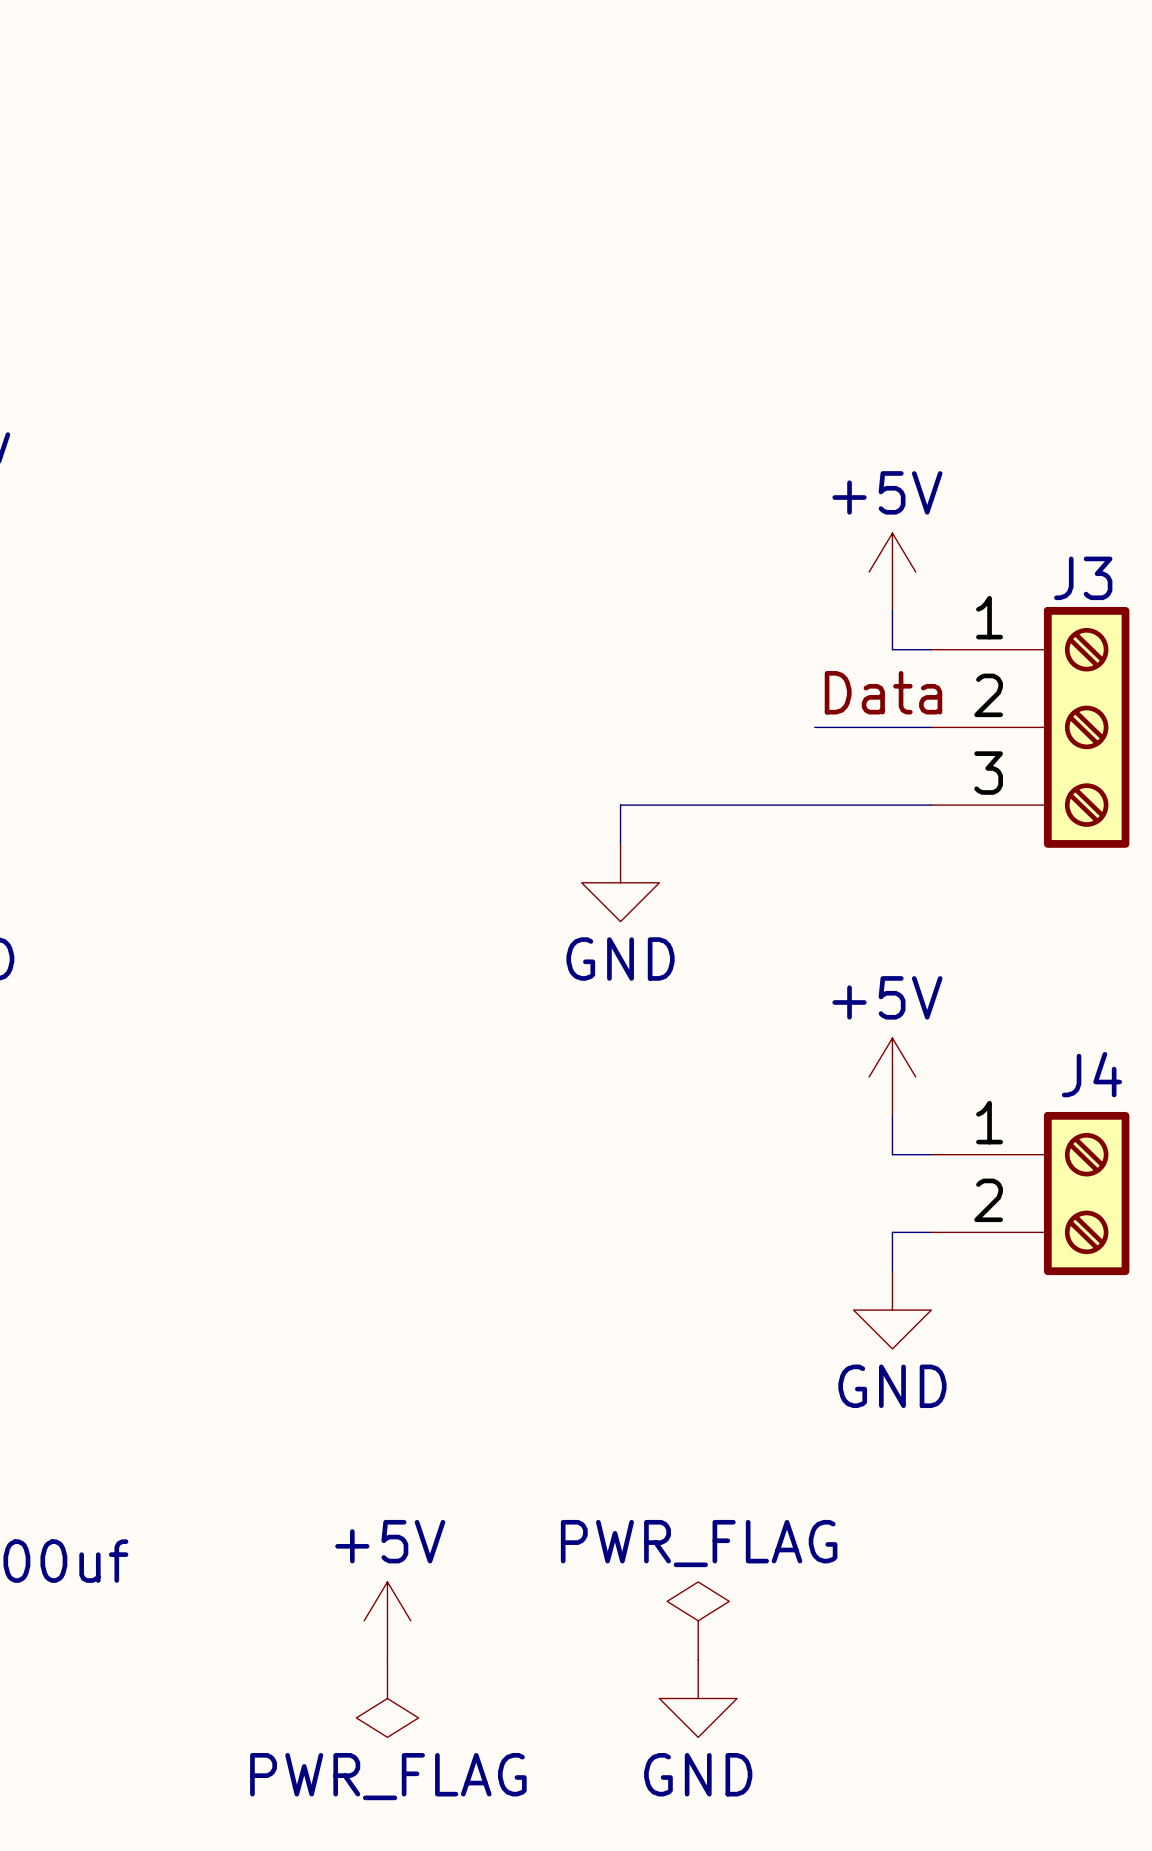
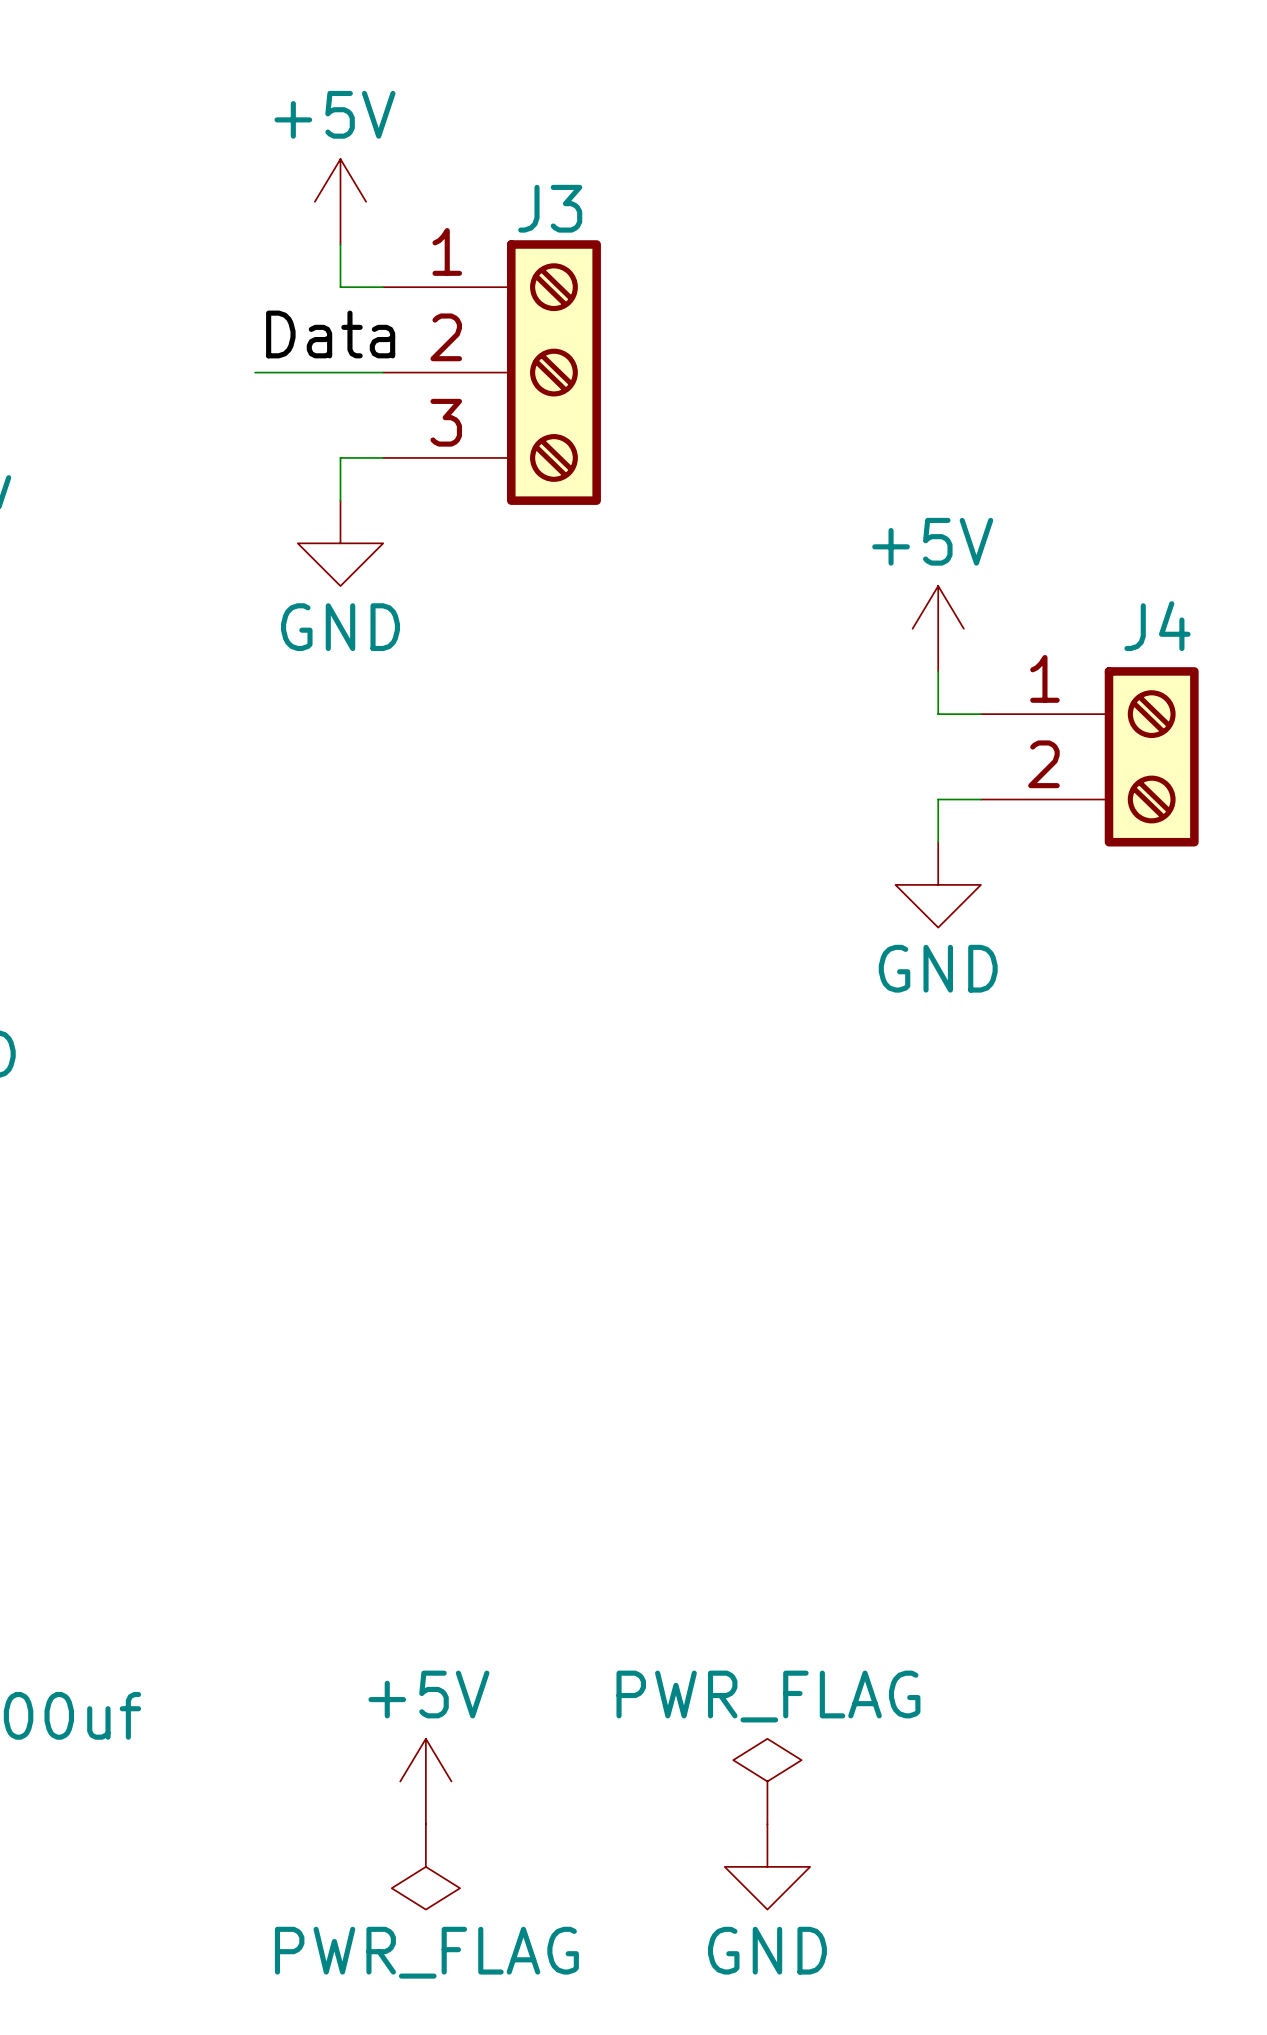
power symbol: none -> +5V (340, 201)
wire: none -> (340, 244) (340, 287) (383, 287)
wire: none -> (255, 372) (383, 372)
wire: none -> (383, 457) (340, 457) (340, 500)
power symbol: none -> GND (340, 543)
power symbol position: +5V (892, 572) -> +5V (938, 628)
wire: (892, 610) (892, 649) (931, 649) -> (938, 671) (938, 714) (980, 714)
label position: Data (883, 692) -> Data (330, 334)
wire: (814, 727) (853, 727) -> (938, 842) (938, 799)
J3 position: (1030, 727) -> (492, 372)
wire: (931, 805) (620, 805) (620, 843) -> none
power symbol position: GND (620, 882) -> GND (938, 884)
power symbol: +5V (892, 1077) -> none
wire: (892, 1115) (892, 1154) (931, 1154) -> none
J4 position: (1030, 1193) -> (1089, 756)
wire: (931, 1232) (892, 1232) (892, 1271) -> none
power symbol: GND (892, 1310) -> none

